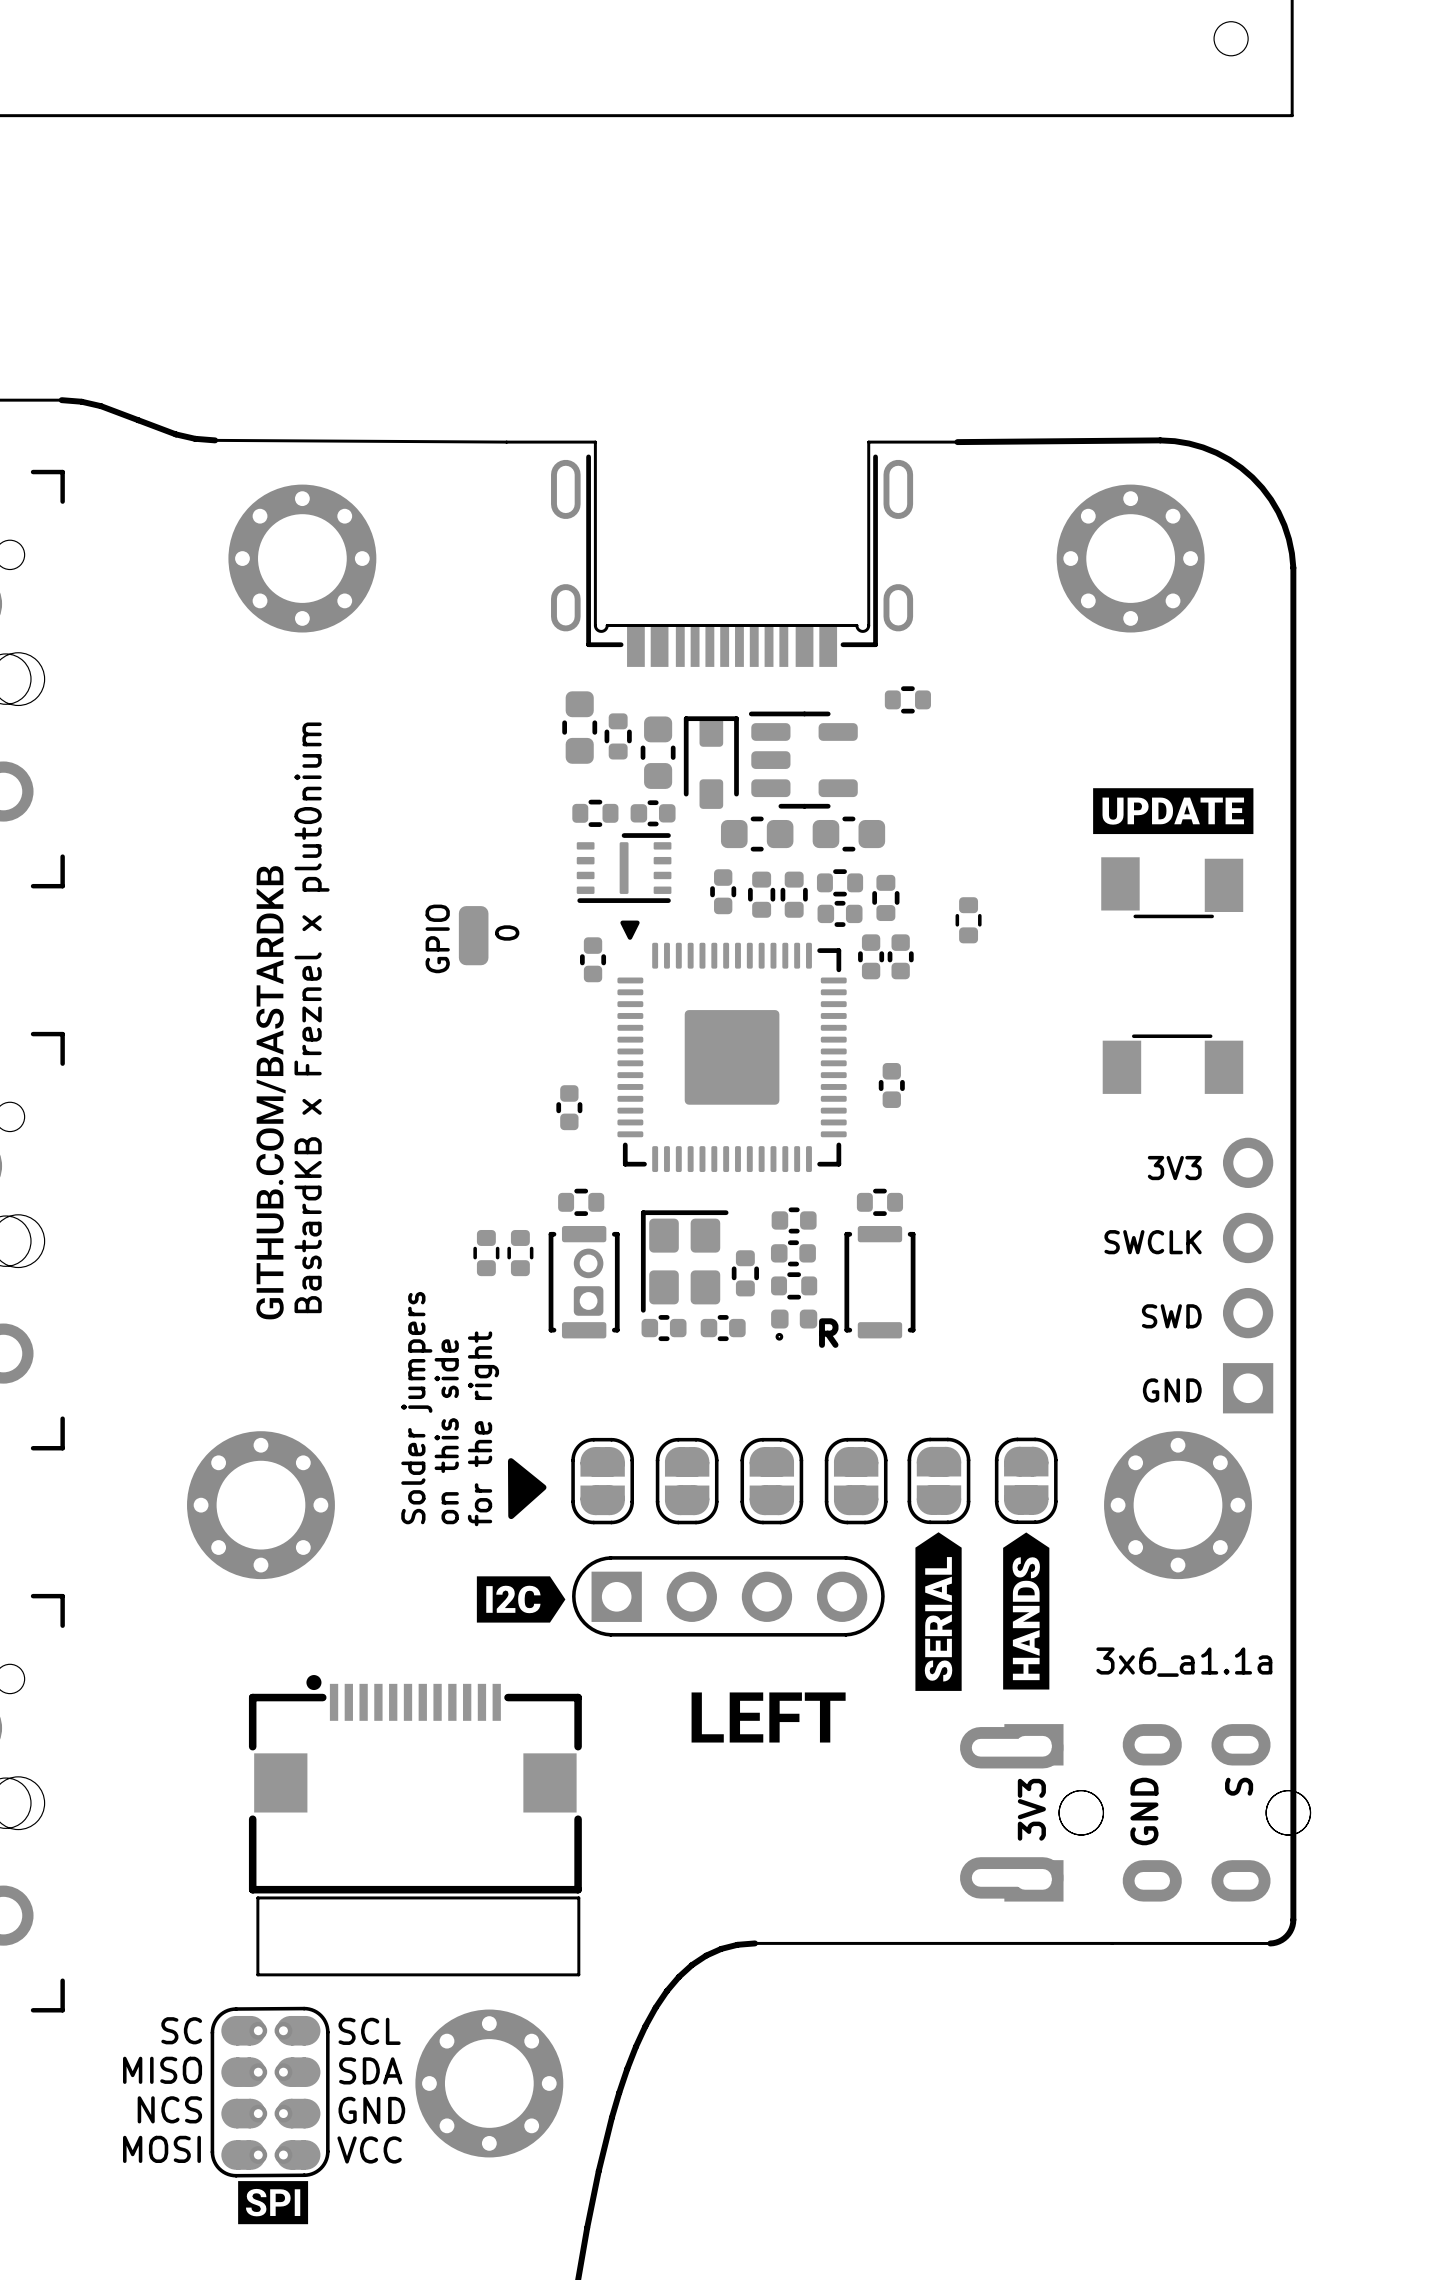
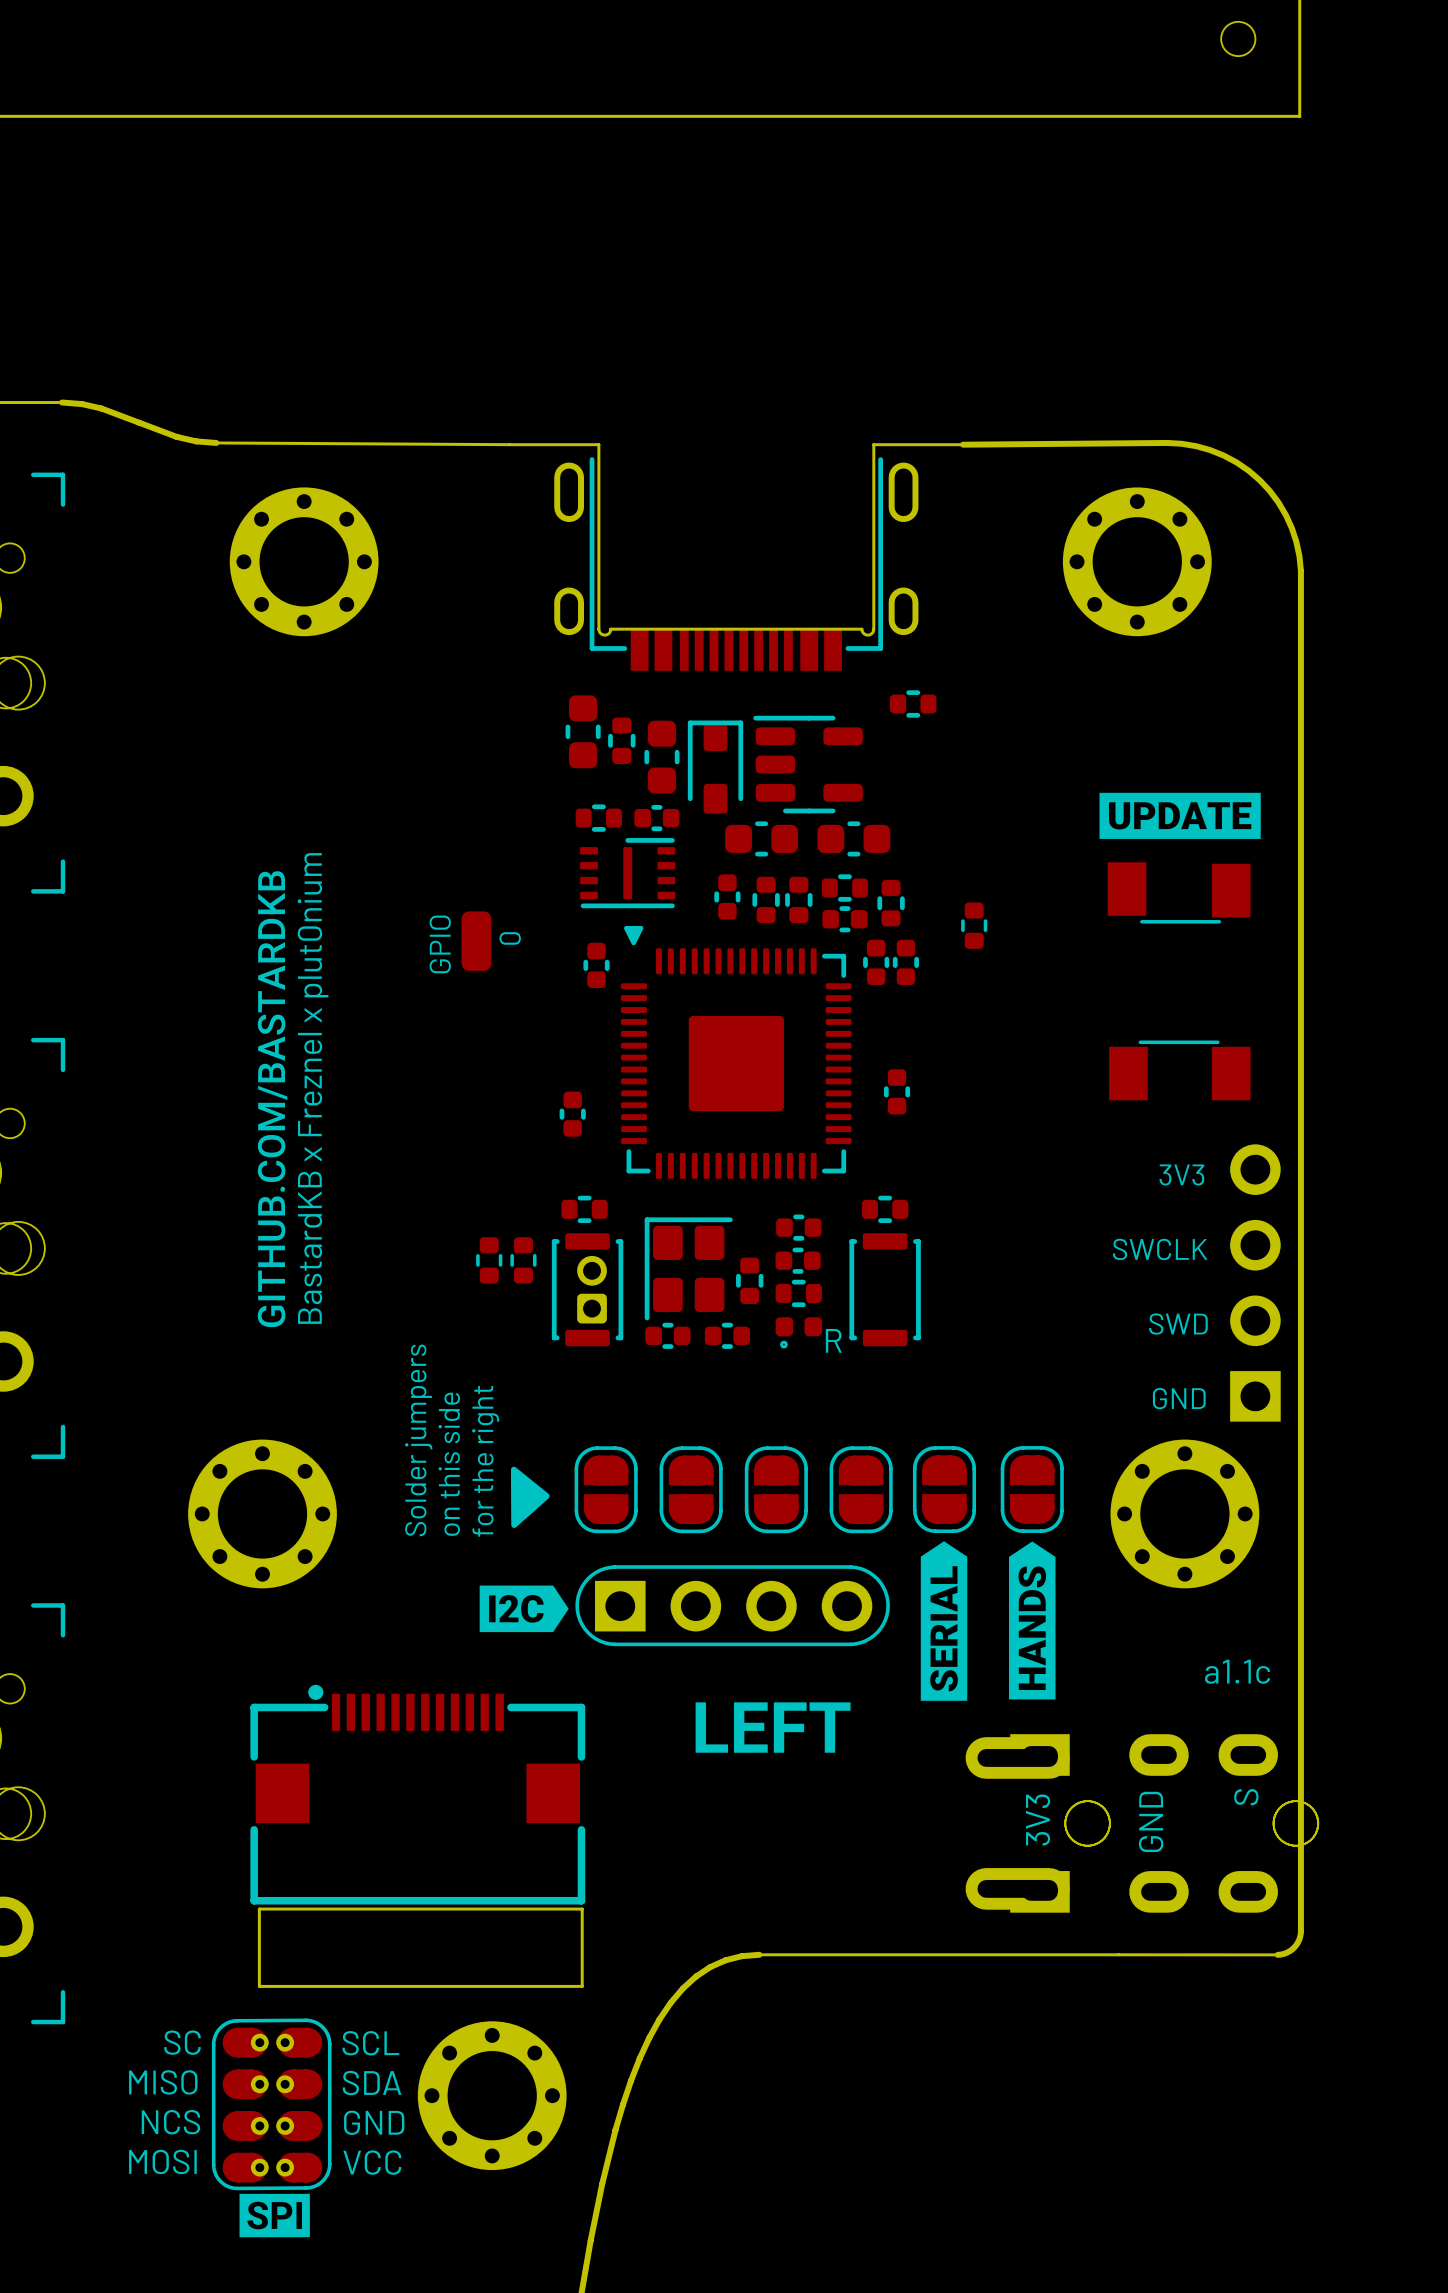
text: none -> a1.1c (1237, 1671)
text: 3x6_a1.1a (1184, 1662) -> none

